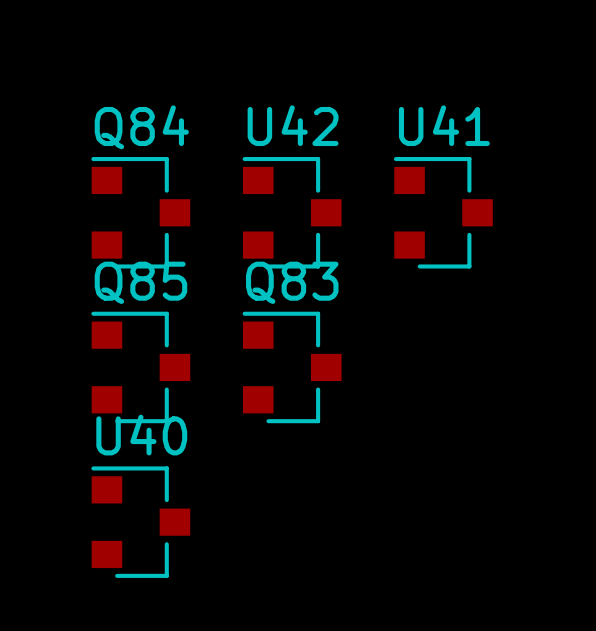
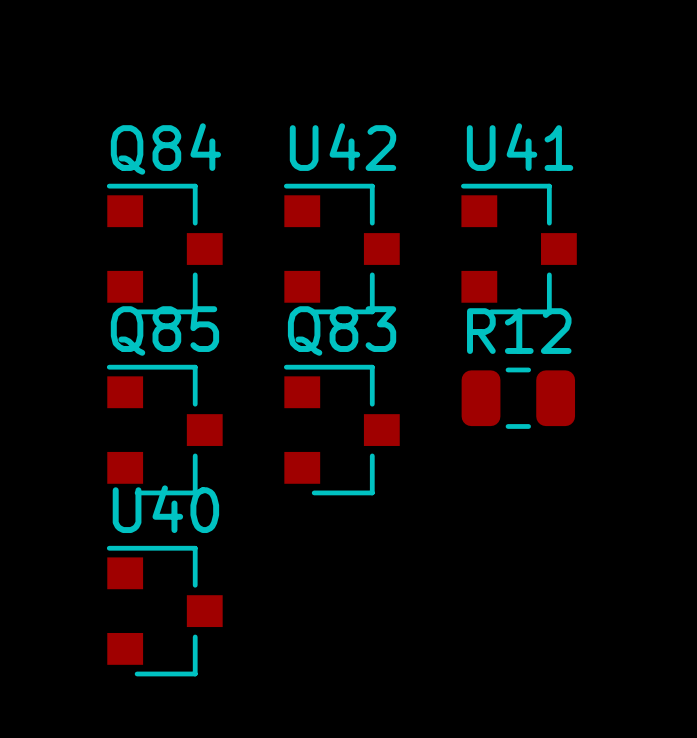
R12: none -> (518, 398)

